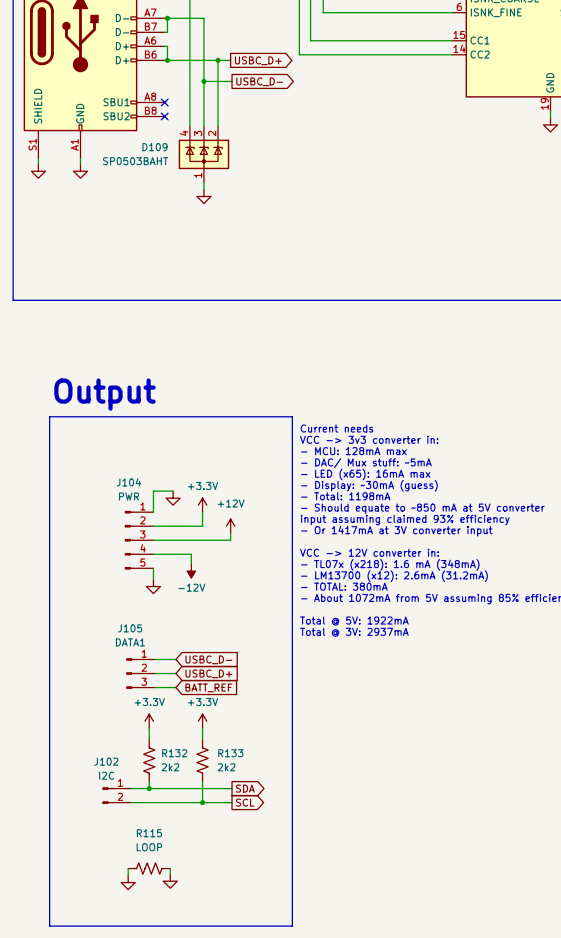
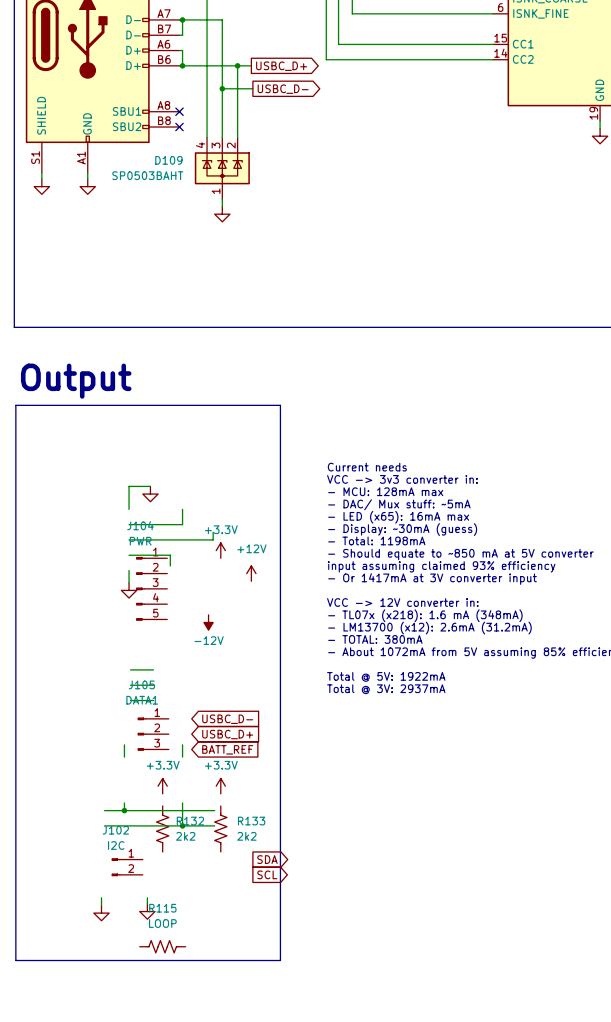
text position: Output (105, 394) -> Output (76, 381)
line: (49, 416) (292, 416) (292, 926) (49, 926) (49, 416) -> (15, 405) (280, 405) (280, 960) (15, 960) (15, 405)
power symbol: none -> (150, 494)
wire: (173, 491) (153, 491) (153, 512) -> (150, 486) (129, 486) (129, 509)
power symbol: (173, 498) -> none
wire: (202, 512) (202, 526) (153, 526) -> (182, 509) (182, 524) (129, 524)
wire: (230, 533) (230, 540) (153, 540) -> (213, 532) (213, 539) (129, 539)
power symbol: none -> (129, 590)
wire: (153, 554) (191, 554) (191, 564) -> (129, 555) (170, 555) (170, 565)
wire: (153, 568) (153, 579) -> (129, 570) (129, 582)
power symbol: (153, 586) -> none
wire: (154, 659) (175, 659) -> (130, 669) (153, 669)
wire: (154, 673) (175, 673) -> (130, 685) (153, 685)
wire: (154, 687) (175, 687) -> (130, 700) (153, 700)
wire: (149, 728) (149, 739) -> (124, 744) (124, 757)
wire: (202, 728) (202, 739) -> (182, 744) (182, 757)
junction: none -> (124, 810)
junction: none -> (182, 825)
wire: (149, 781) (149, 788) -> (124, 802) (124, 810)
wire: (202, 781) (202, 802) -> (182, 802) (182, 825)
wire: (131, 788) (232, 788) -> (104, 810) (214, 810)
junction: (149, 788) -> none
wire: (131, 802) (232, 802) -> (104, 825) (214, 825)
junction: (202, 802) -> none
power symbol: none -> (147, 911)
power symbol: none -> (101, 913)
wire: (128, 868) (128, 875) -> (101, 897) (101, 905)
wire: (170, 868) (170, 874) -> (147, 897) (147, 903)
power symbol: (170, 881) -> none
power symbol: (128, 882) -> none

